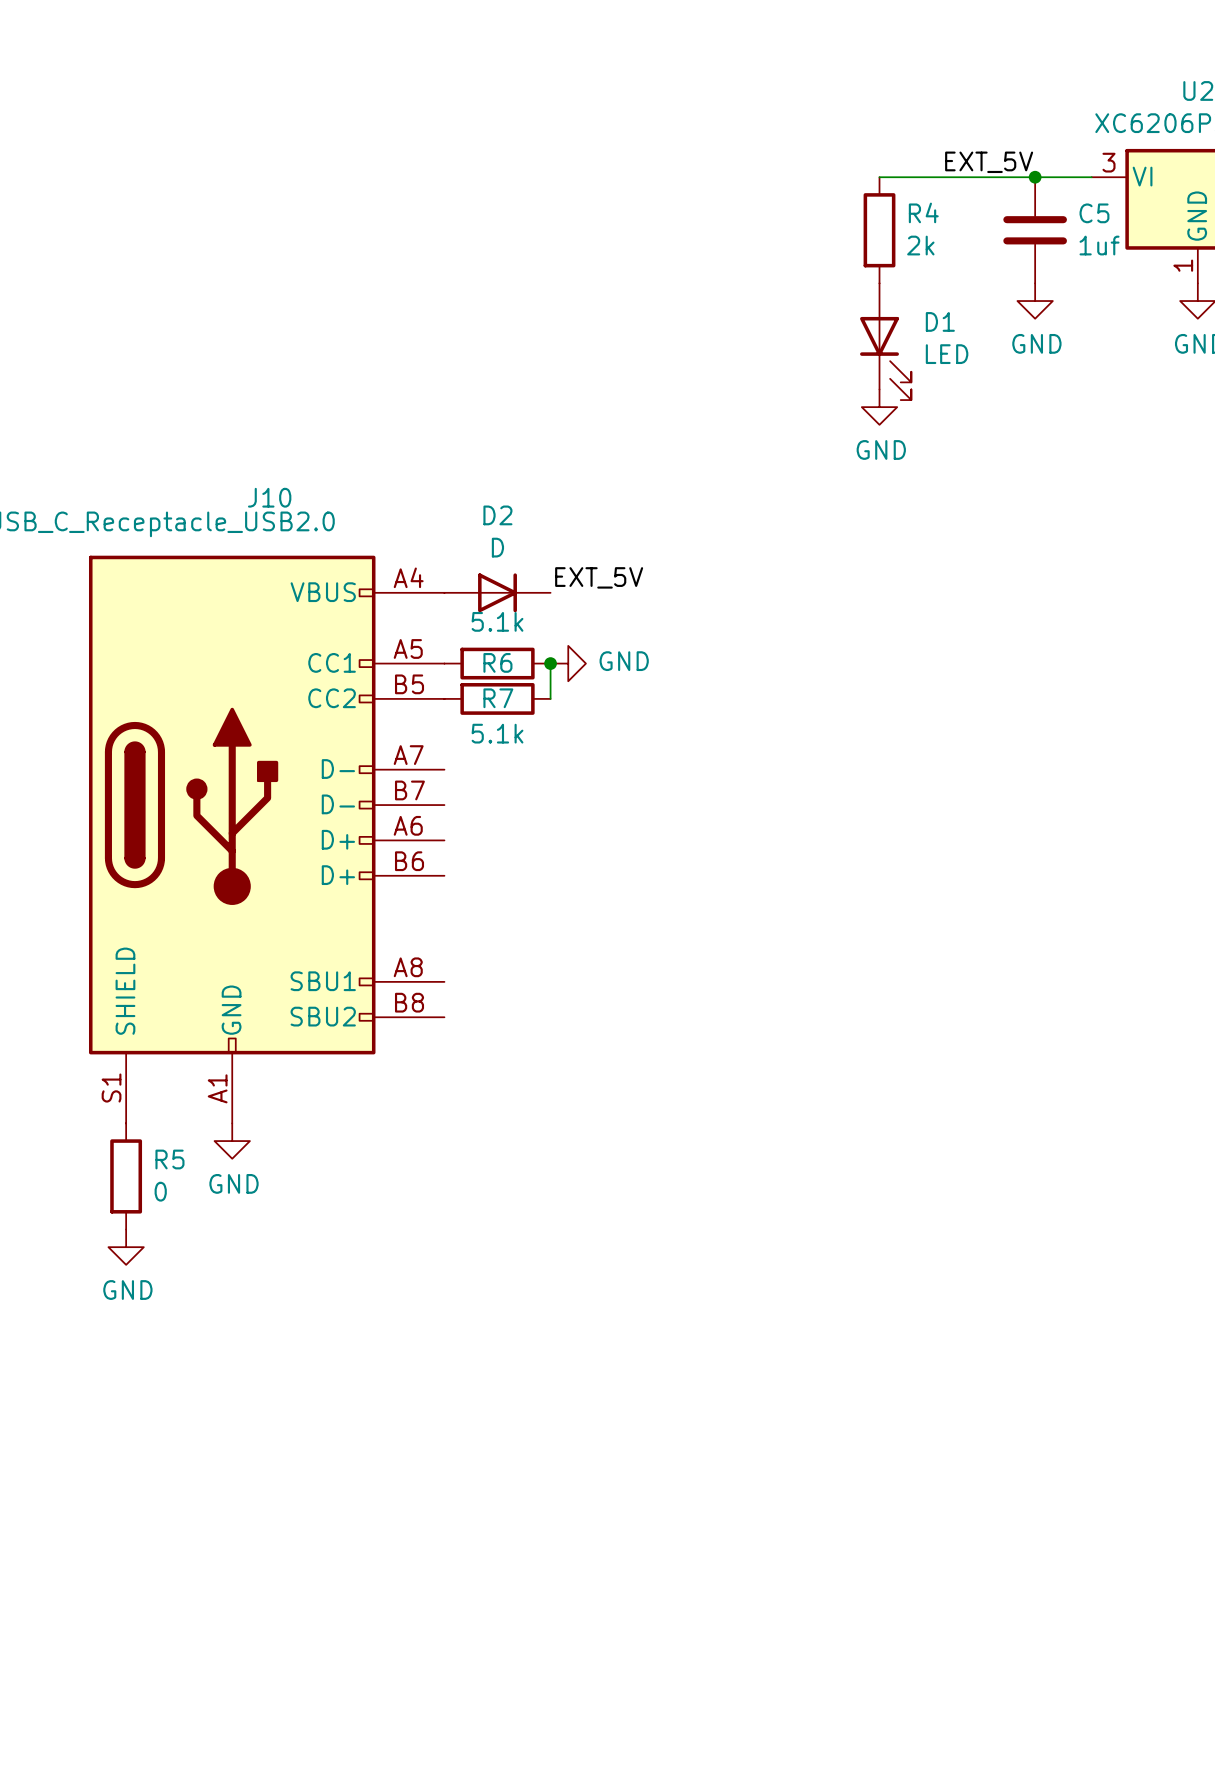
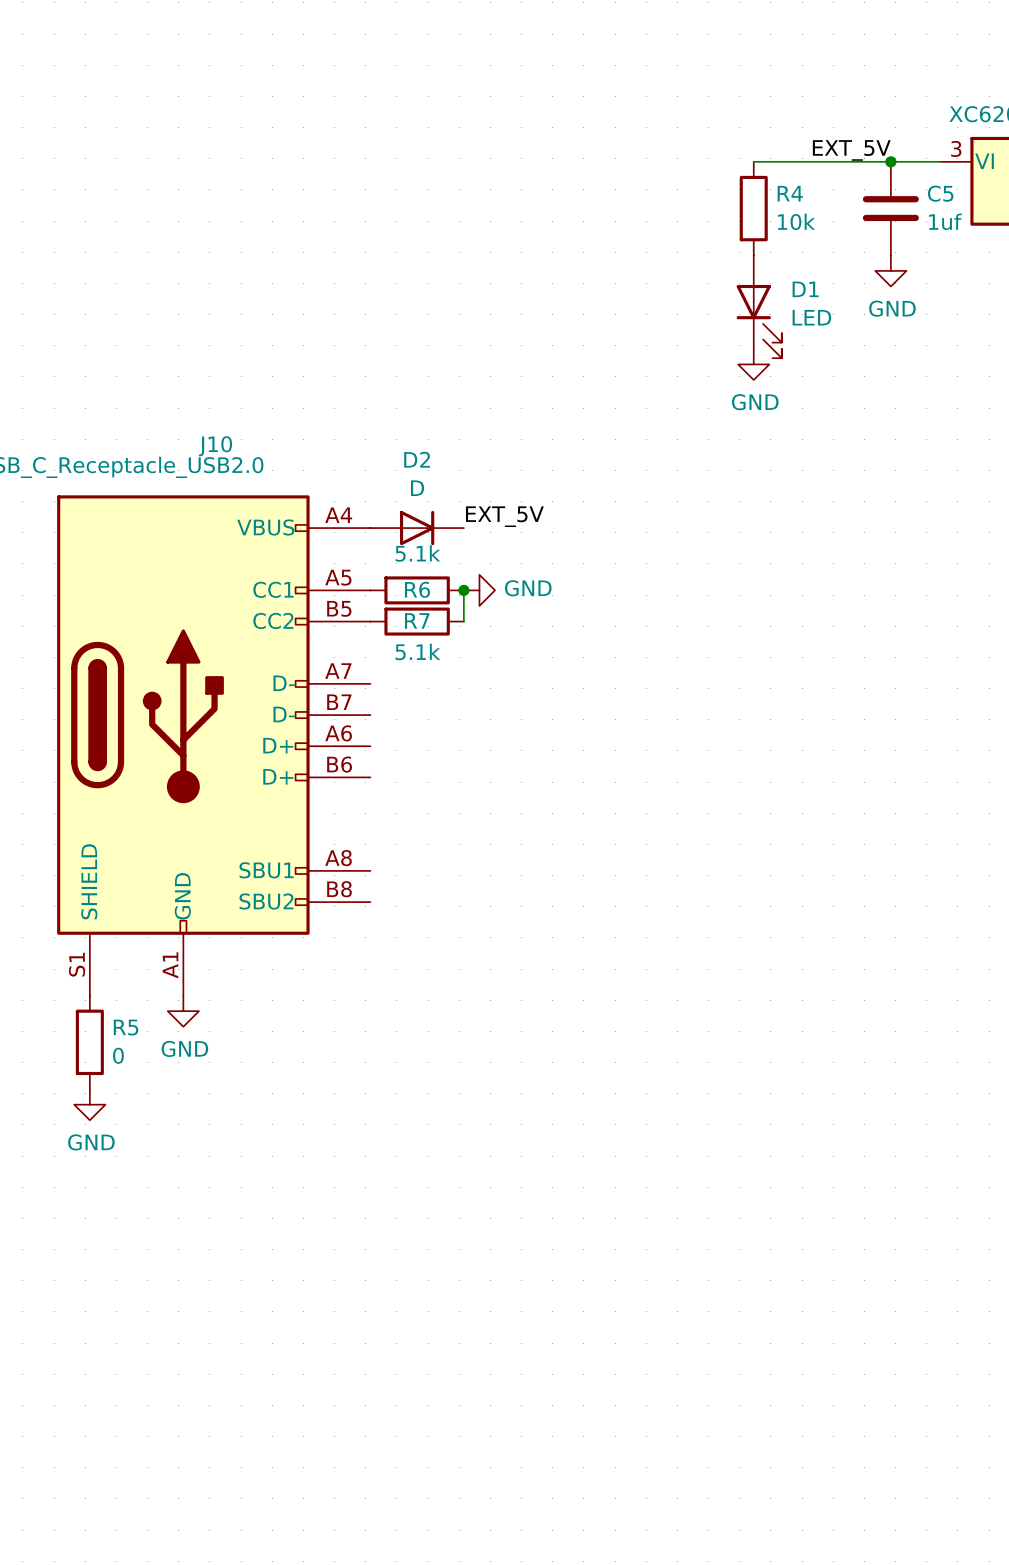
R4 value: 2k (920, 245) -> 10k (796, 221)

